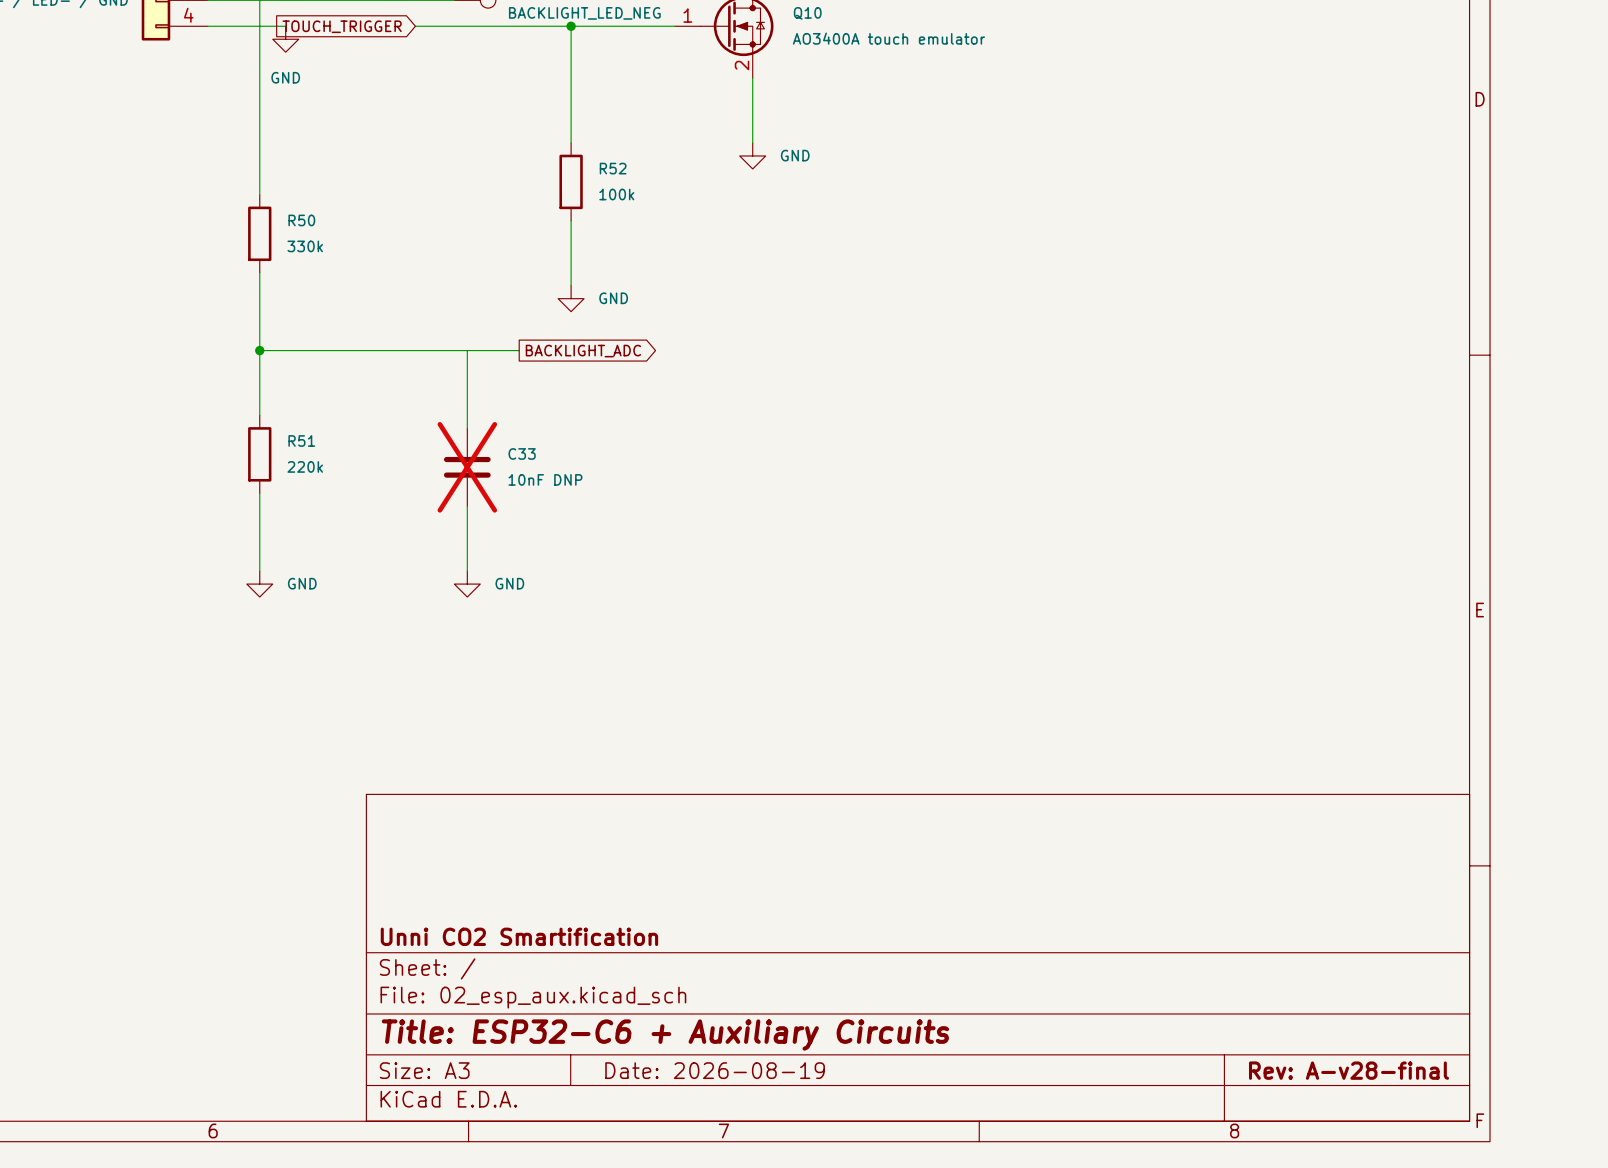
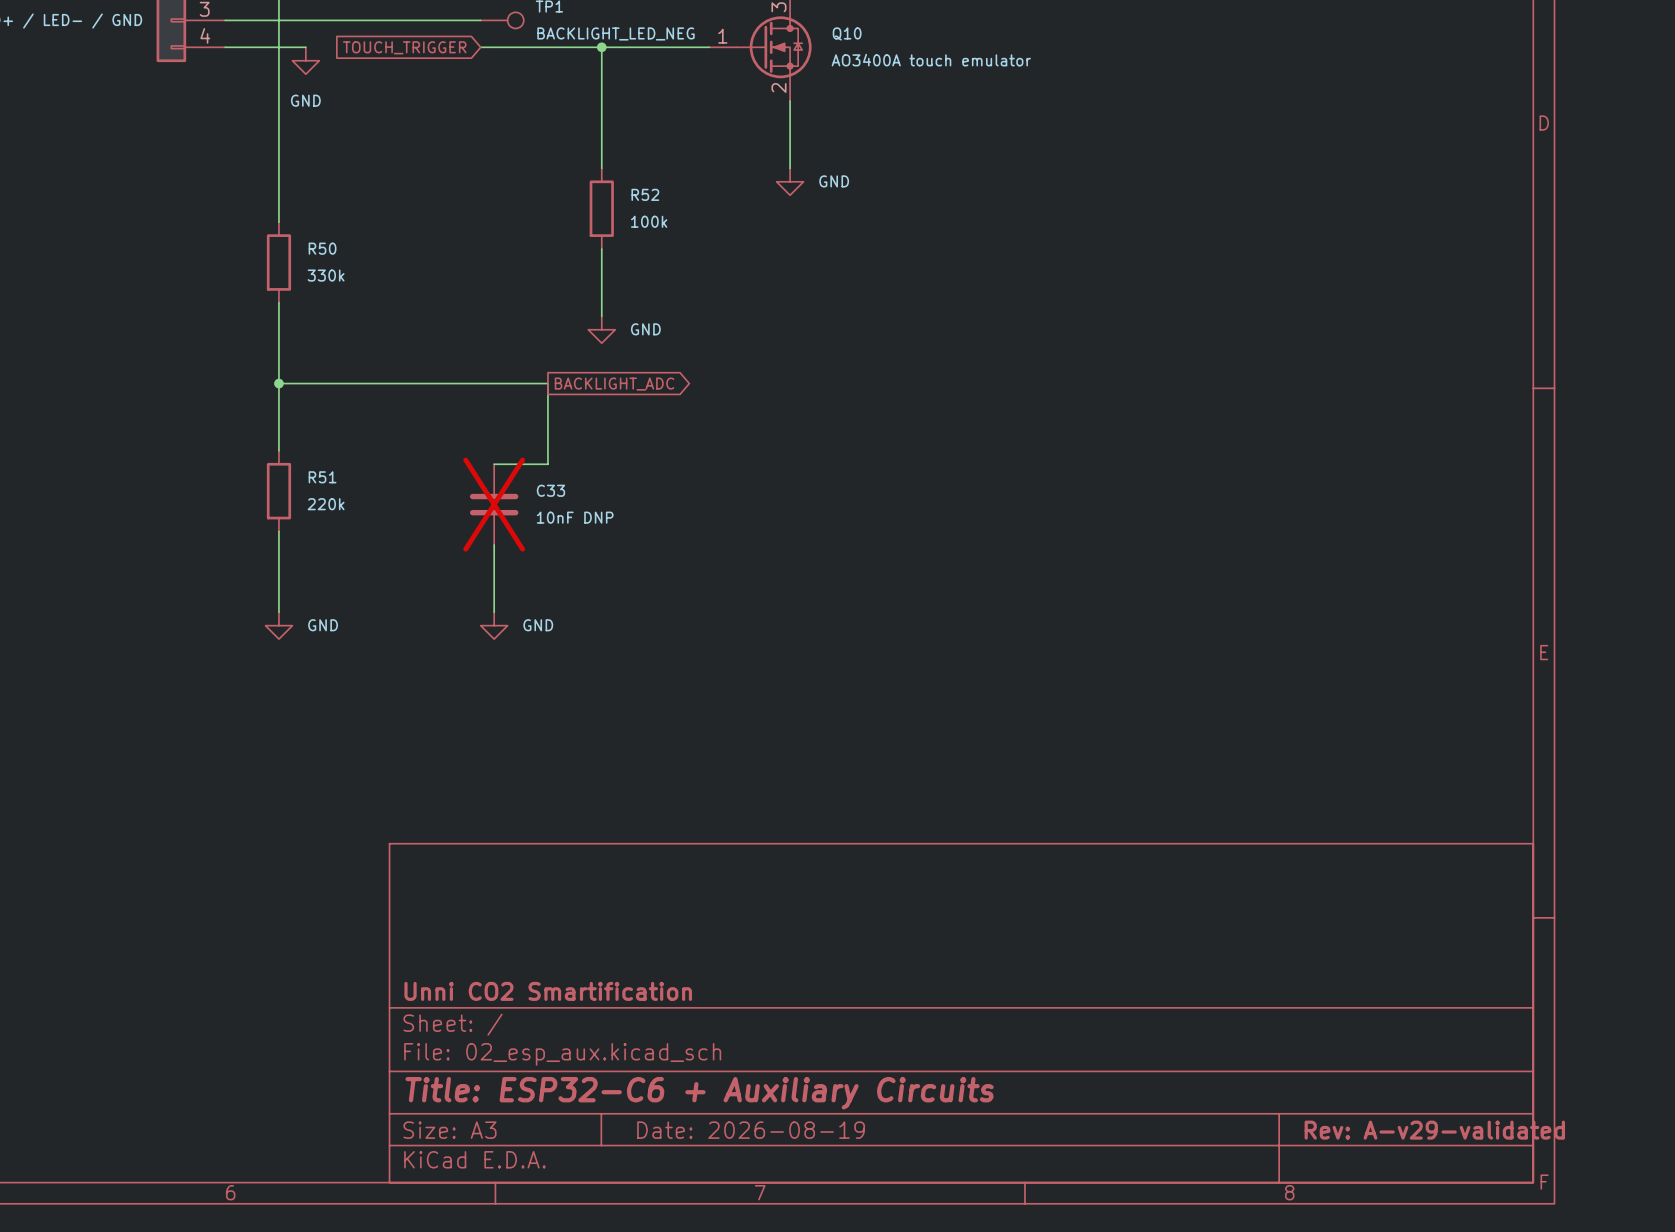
global label position: TOUCH_TRIGGER (342, 26) -> TOUCH_TRIGGER (404, 47)
wire: (415, 26) (454, 26) -> none
wire: (467, 350) (467, 428) -> (547, 383) (547, 464) (494, 464)
title block: Rev: A-v28-final (1349, 1070) -> Rev: A-v29-validated (1434, 1130)

